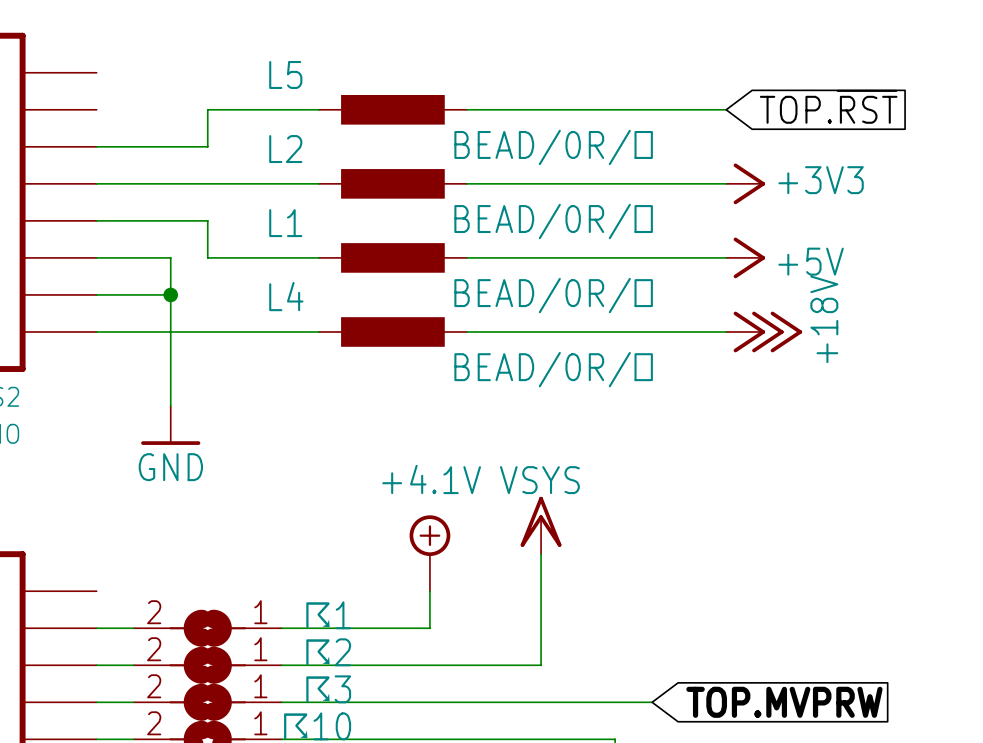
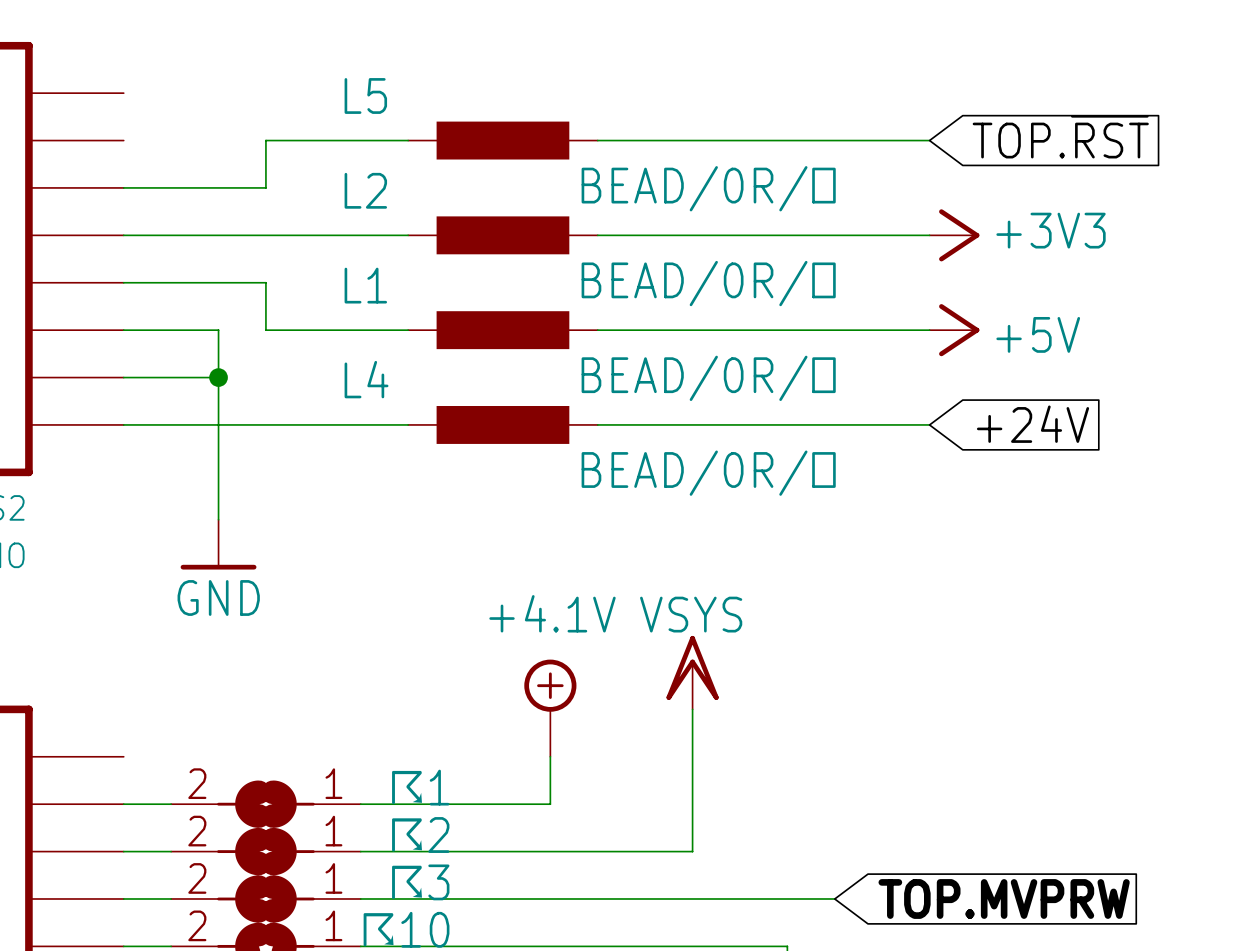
power symbol: +18V (764, 331) -> none
global label: none -> +24V (1033, 424)

